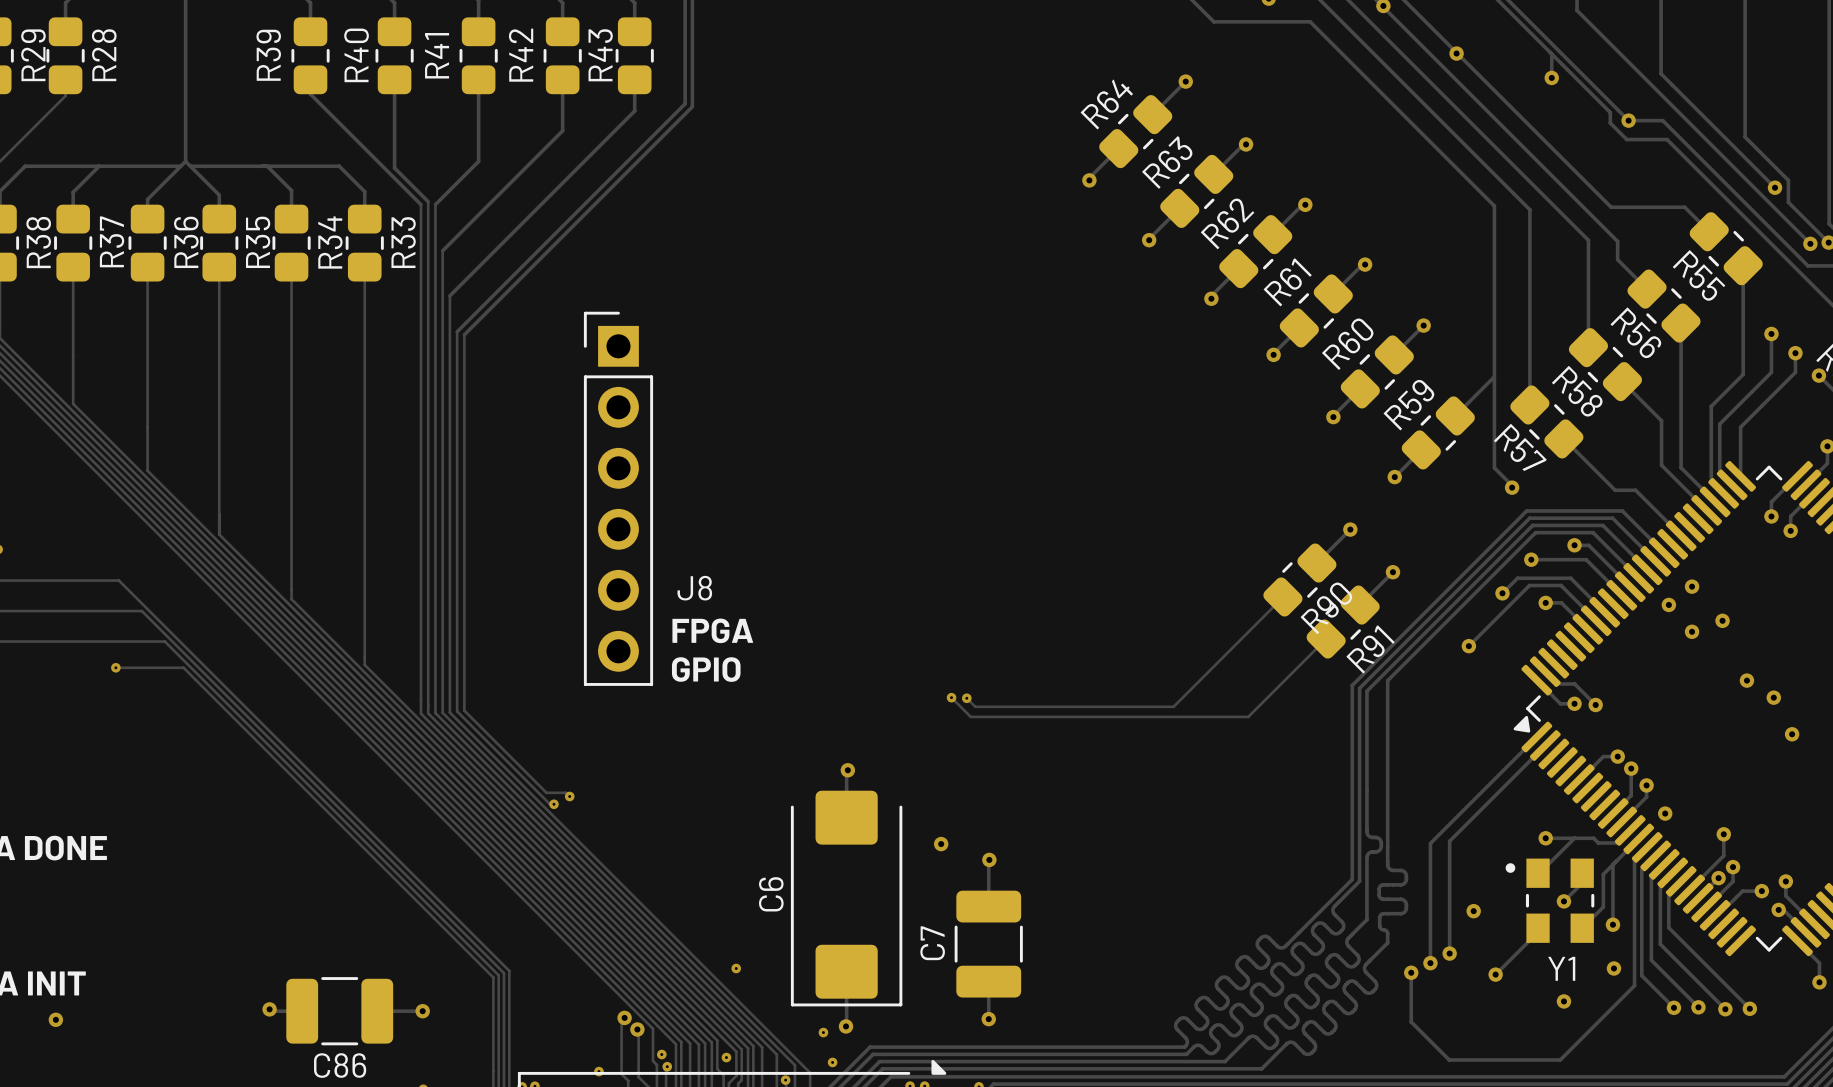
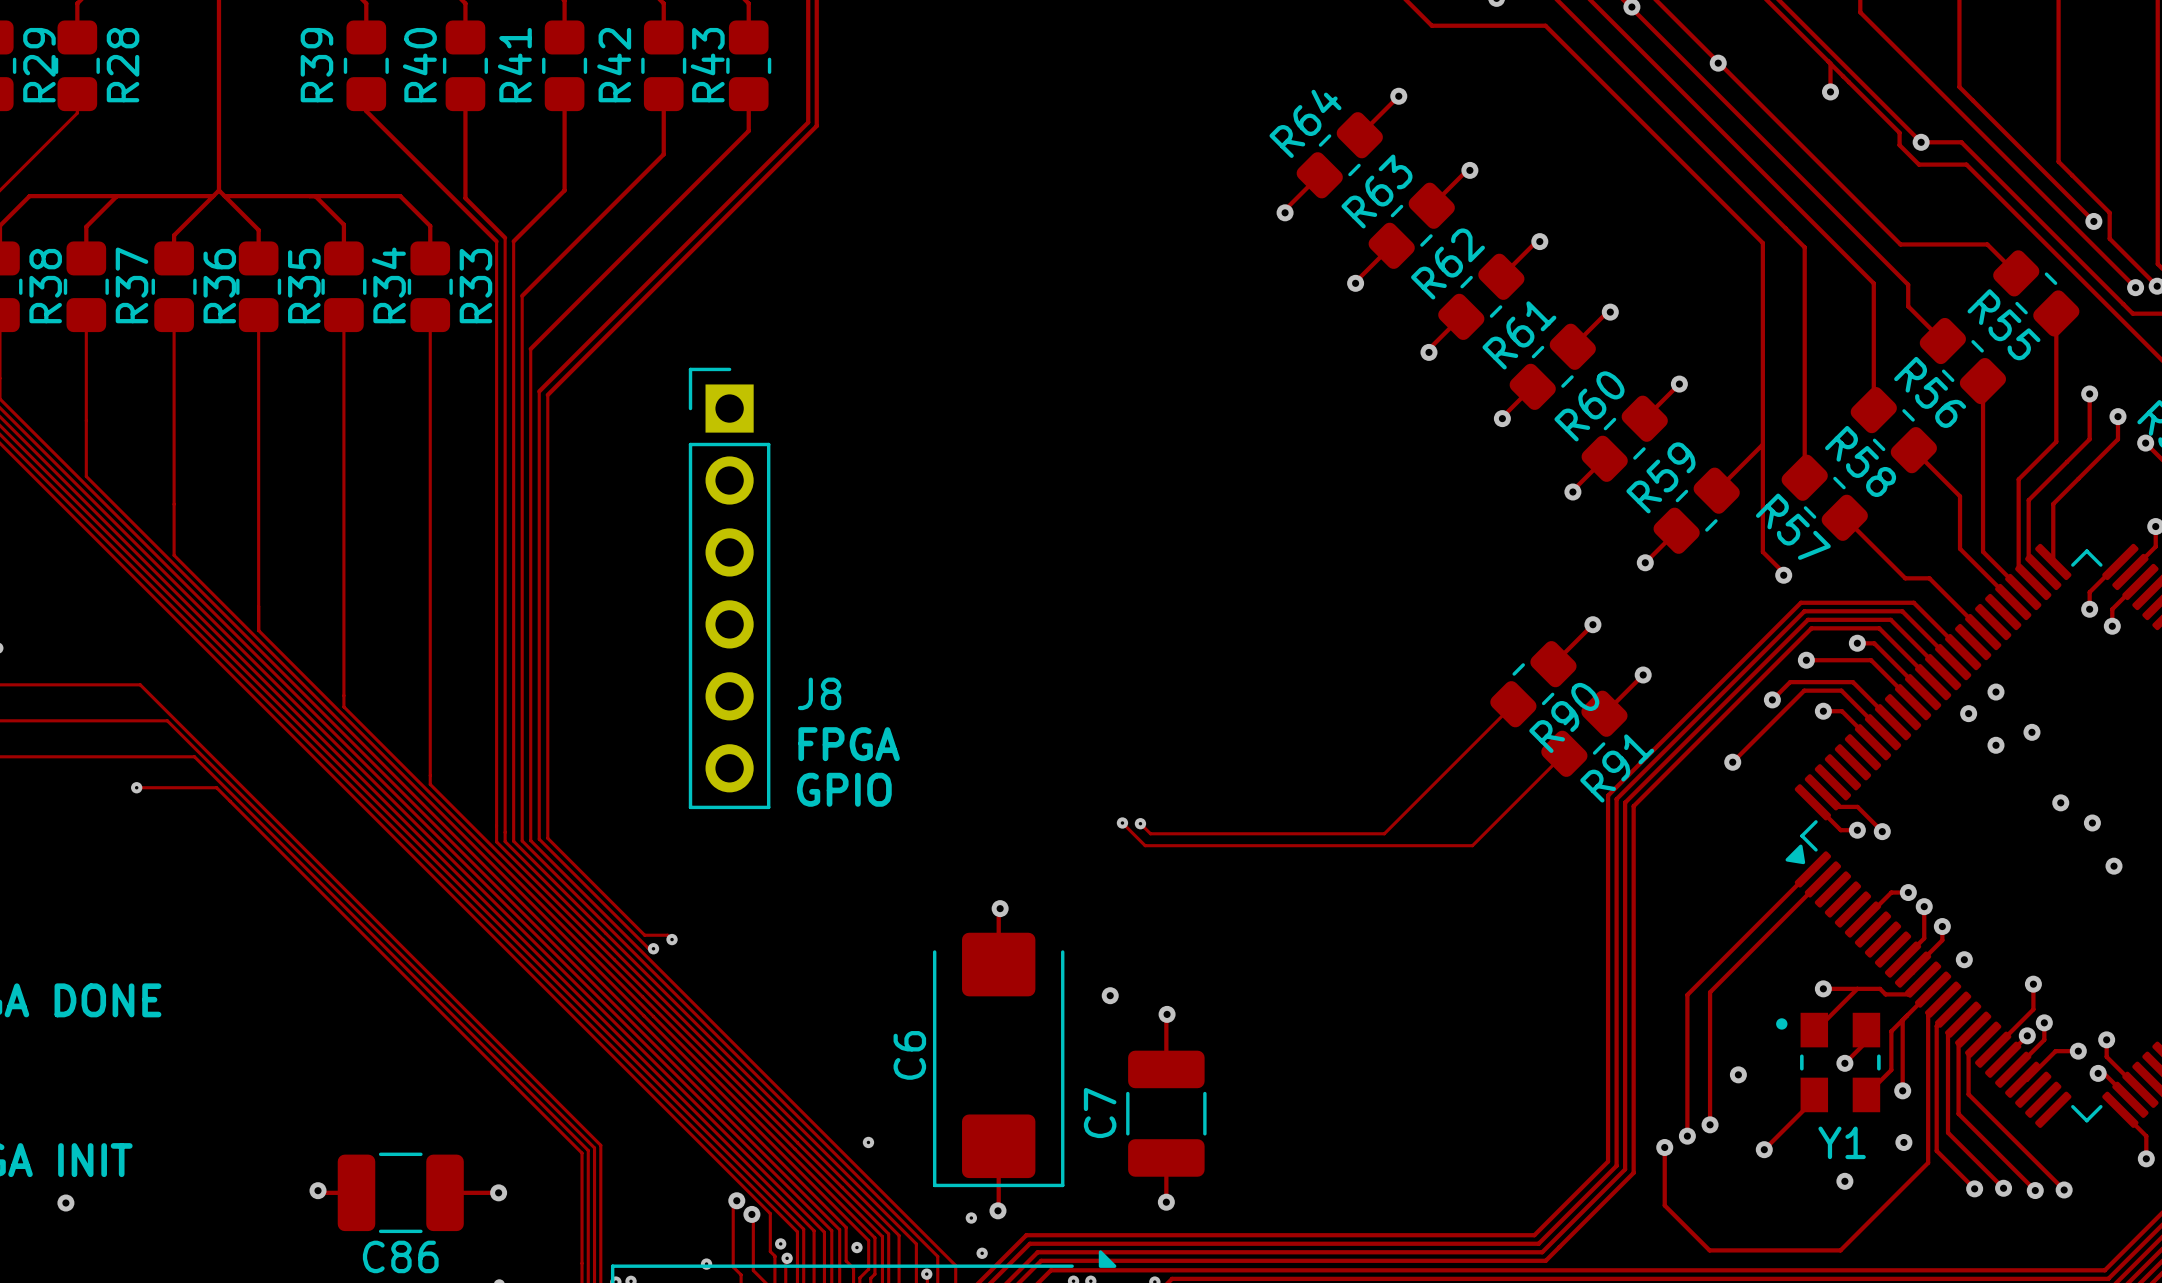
track: (1363, 674) (1352, 685) (1352, 879) (1284, 947) (1278, 947) (1266, 936) (1260, 938) (1257, 941) (1257, 946) (1268, 959) (1264, 967) (1258, 967) (1245, 956) (1238, 960) (1237, 966) (1247, 978) (1247, 983) (1243, 987) (1239, 988) (1226, 977) (1220, 978) (1216, 986) (1227, 998) (1227, 1003) (1219, 1009) (1205, 997) (1197, 1001) (1196, 1008) (1207, 1020) (1202, 1028) (1196, 1028) (1185, 1018) (1177, 1021) (1176, 1028) (1187, 1040) (1184, 1047) -> (1608, 795) (1608, 1161) (1534, 1235) (1397, 1235)
track: (1370, 677) (1359, 688) (1359, 881) (1332, 909) (1334, 913) (1343, 923) (1343, 928) (1335, 933) (1323, 923) (1316, 924) (1312, 932) (1322, 943) (1321, 950) (1314, 954) (1302, 944) (1297, 944) (1292, 951) (1302, 964) (1301, 970) (1293, 974) (1279, 963) (1272, 969) (1272, 974) (1282, 985) (1278, 993) (1272, 994) (1259, 984) (1252, 988) (1252, 994) (1262, 1006) (1258, 1013) (1252, 1014) (1239, 1004) (1232, 1008) (1231, 1014) (1241, 1026) (1238, 1034) (1231, 1035) (1221, 1025) (1216, 1025) (1210, 1032) (1218, 1044) (1215, 1051) (1209, 1053) (1197, 1045) (1186, 1054) -> (1616, 799) (1616, 1165) (1538, 1243) (1399, 1243)
track: (1377, 680) (1366, 691) (1366, 831) (1369, 836) (1379, 839) (1381, 846) (1378, 851) (1370, 852) (1367, 856) (1366, 919) (1347, 940) (1348, 945) (1358, 956) (1358, 961) (1354, 965) (1350, 966) (1337, 955) (1330, 955) (1326, 963) (1338, 976) (1337, 983) (1329, 987) (1316, 975) (1311, 975) (1307, 979) (1306, 984) (1317, 997) (1316, 1003) (1312, 1007) (1308, 1007) (1294, 995) (1290, 996) (1286, 1001) (1286, 1006) (1297, 1018) (1294, 1026) (1287, 1027) (1274, 1016) (1270, 1016) (1266, 1020) (1266, 1026) (1277, 1038) (1273, 1046) (1267, 1047) (1256, 1037) (1251, 1036) (1225, 1061) -> (1625, 802) (1625, 1169) (1542, 1252) (1445, 1252)
track: (1387, 680) (1387, 865) (1391, 870) (1404, 871) (1406, 879) (1401, 884) (1381, 885) (1379, 895) (1382, 899) (1403, 899) (1406, 903) (1406, 909) (1401, 913) (1383, 913) (1379, 916) (1379, 927) (1387, 932) (1387, 942) (1364, 967) (1365, 972) (1376, 982) (1375, 989) (1367, 993) (1354, 981) (1348, 982) (1344, 990) (1355, 1003) (1354, 1009) (1347, 1013) (1335, 1002) (1330, 1001) (1325, 1005) (1323, 1009) (1335, 1024) (1332, 1032) (1325, 1033) (1311, 1021) (1303, 1027) (1304, 1032) (1315, 1044) (1311, 1052) (1305, 1053) (1294, 1043) (1289, 1042) (1261, 1068) -> (1636, 802) (1633, 806) (1633, 1172) (1545, 1260) (1488, 1260)

